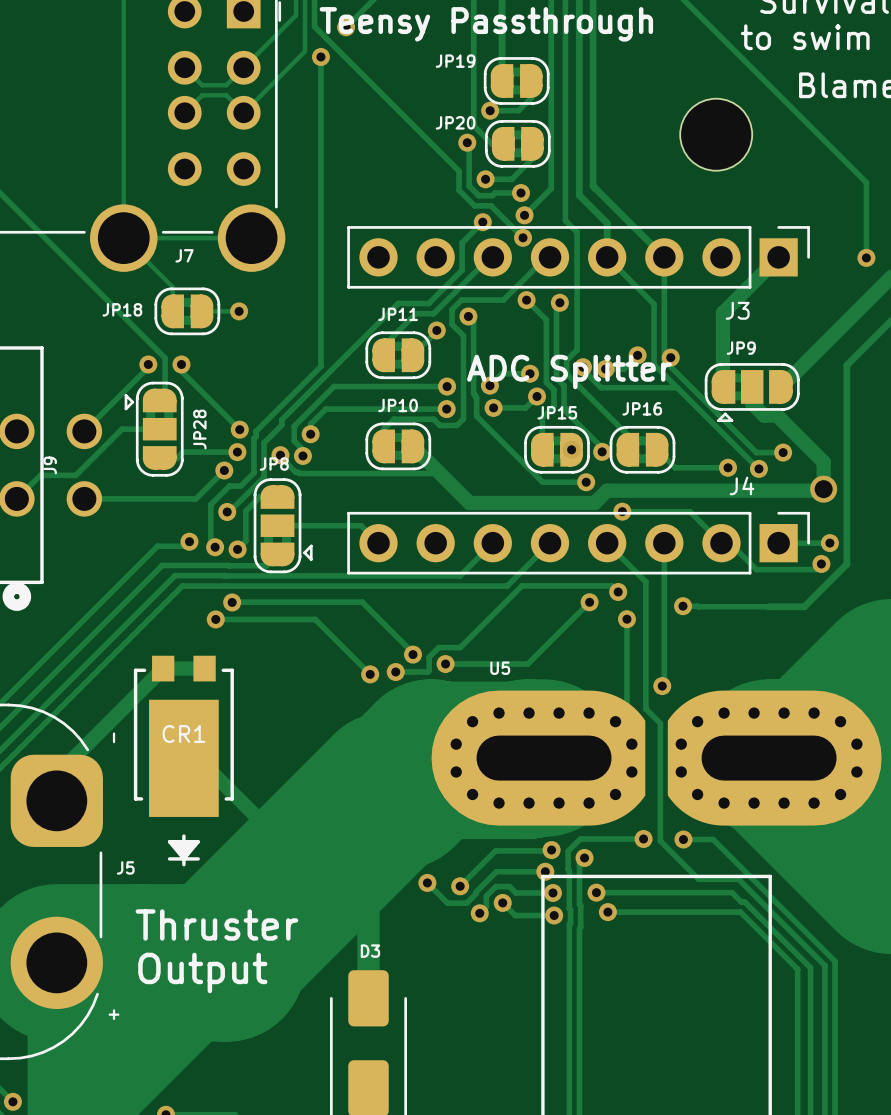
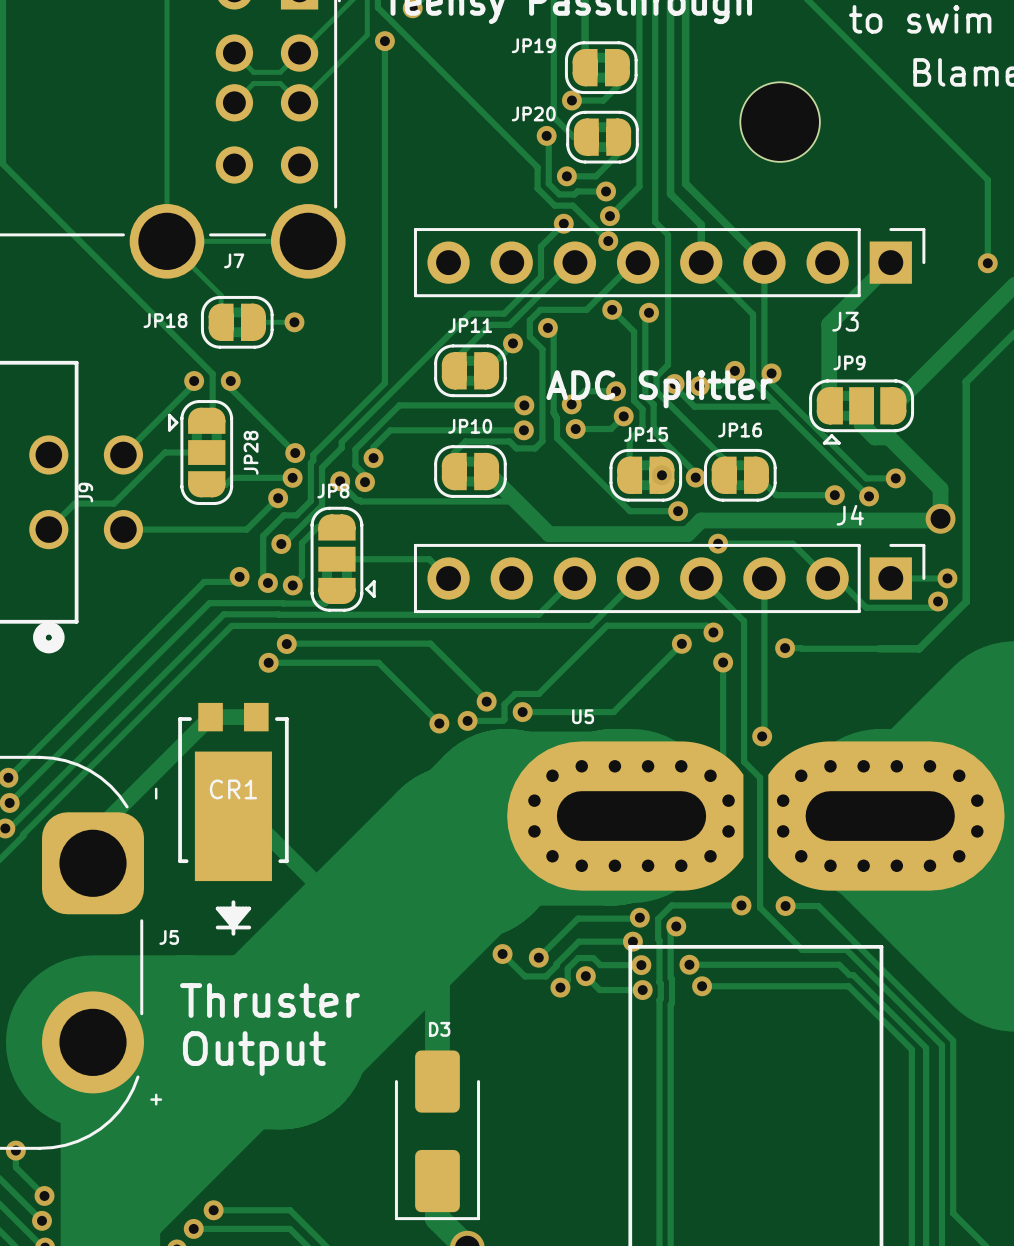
part position: (716, 134) -> (780, 122)

